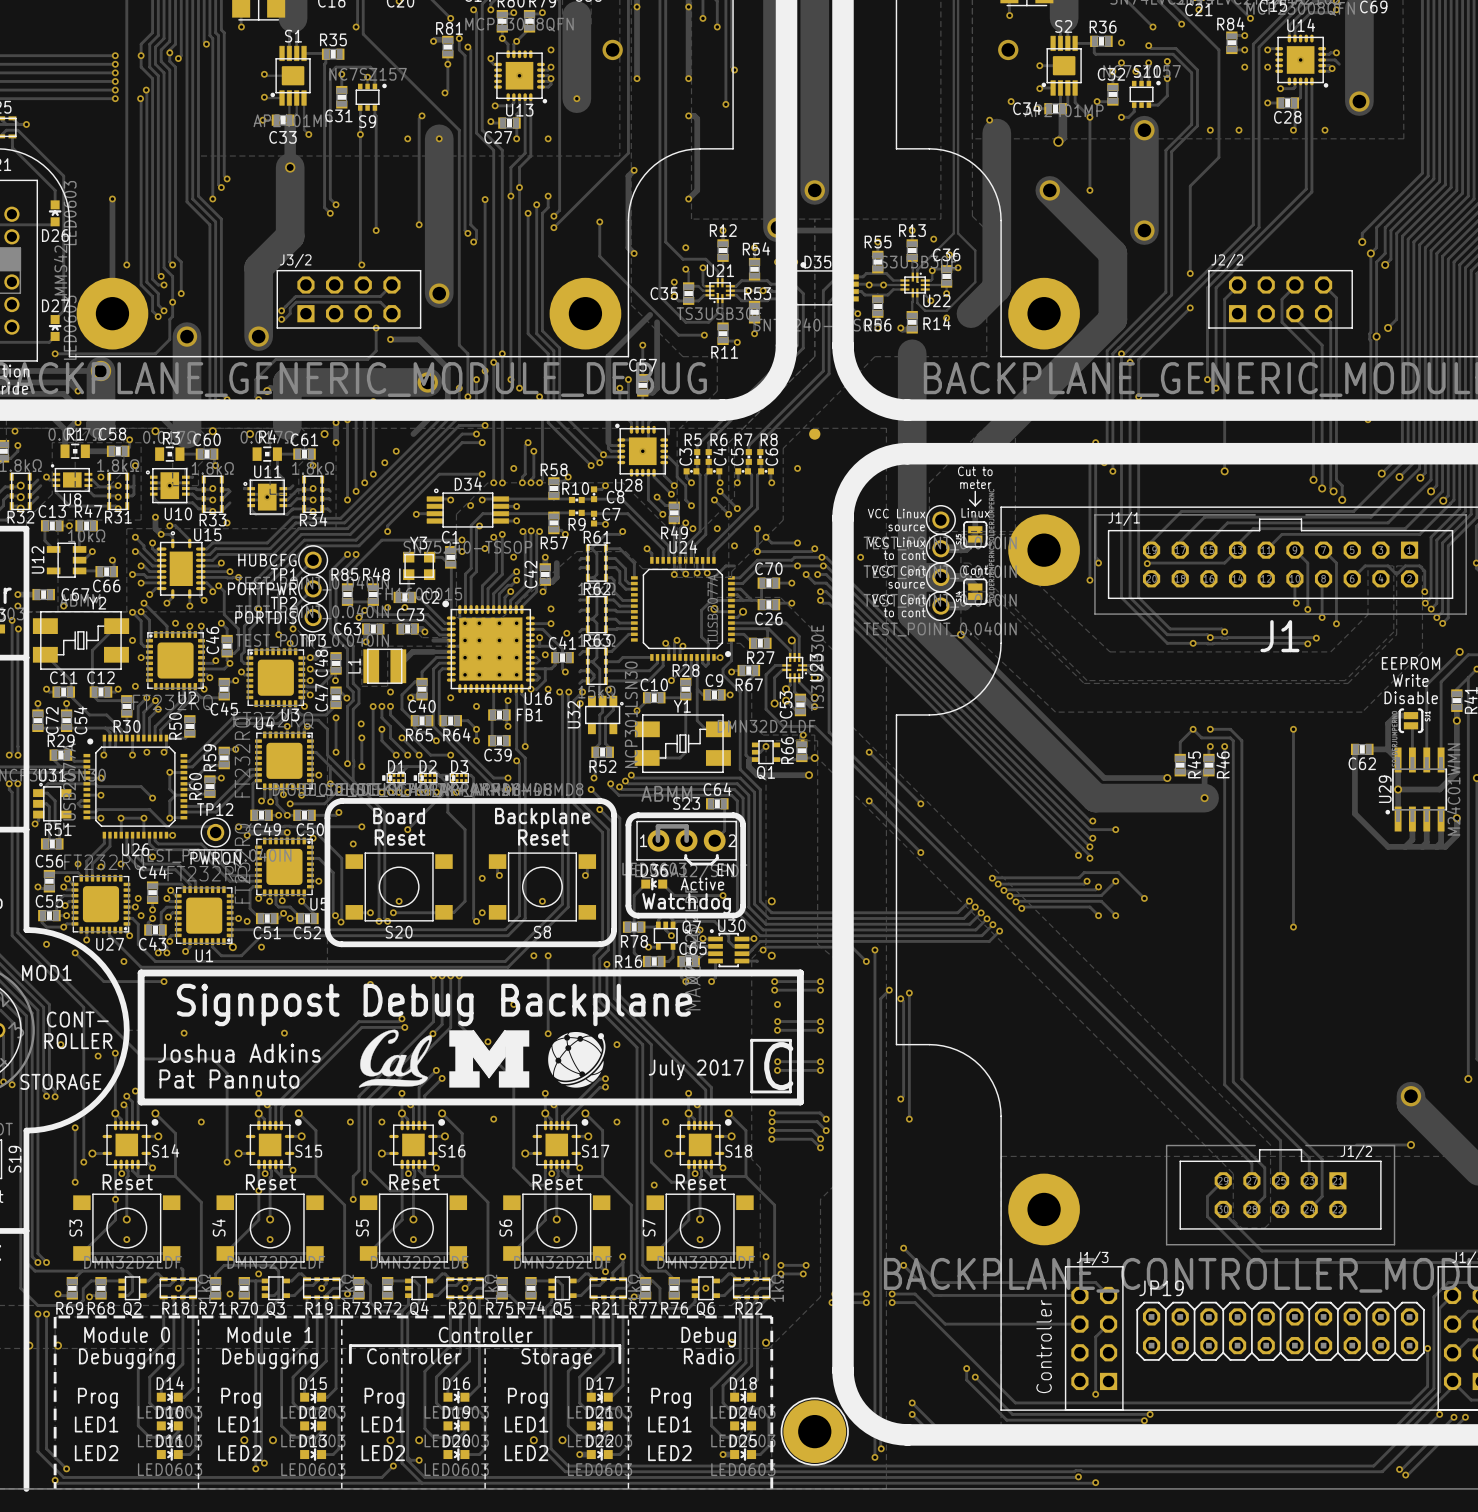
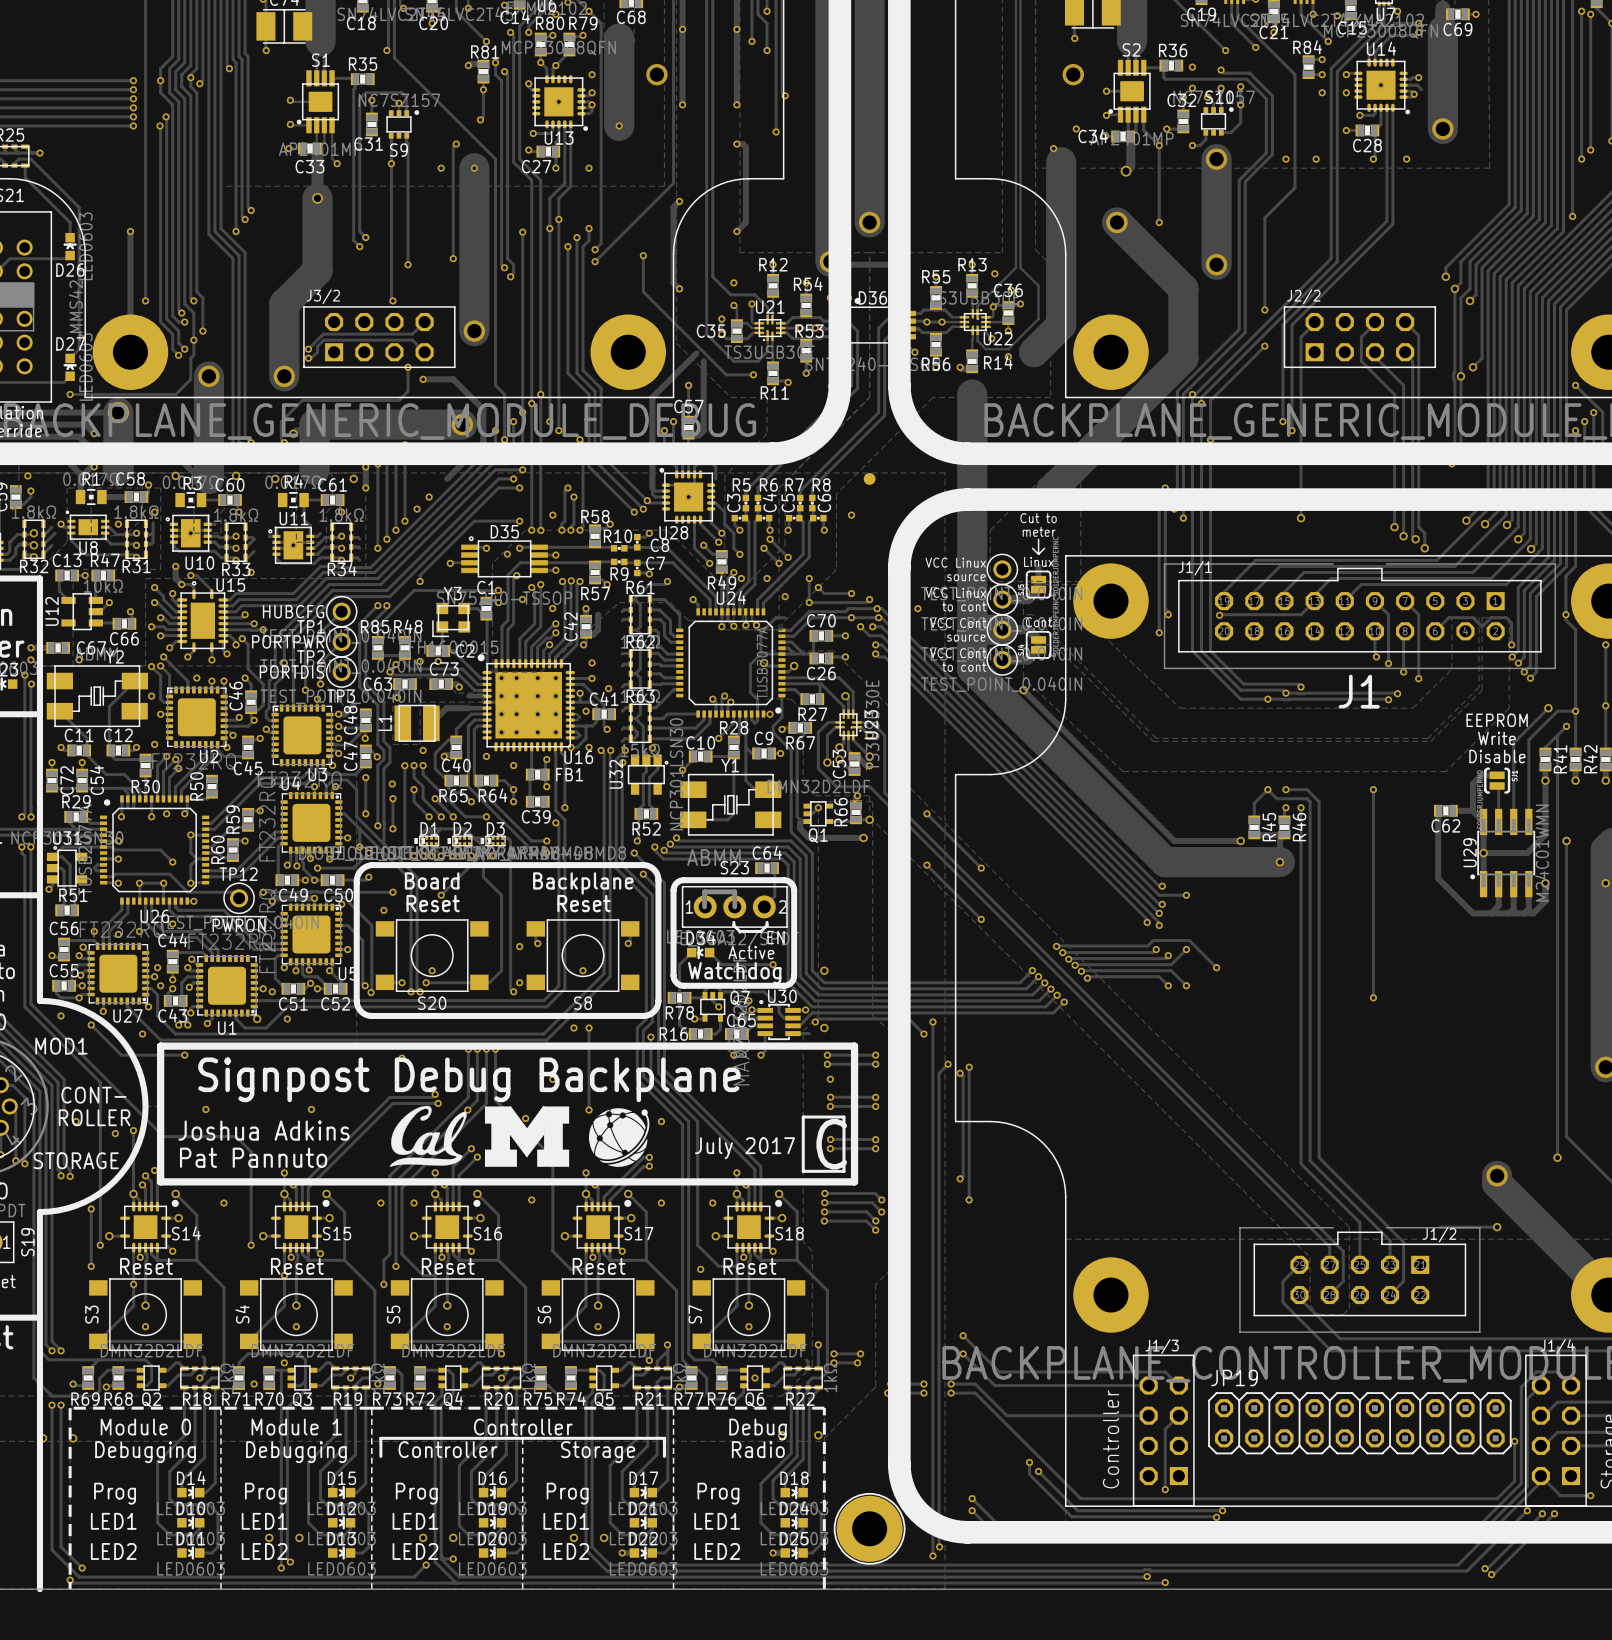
D35 name: D35 (817, 262) -> D36 (872, 297)
D34 name: D34 (468, 483) -> D35 (504, 531)
D36 name: D36 (654, 870) -> D34 (701, 937)

